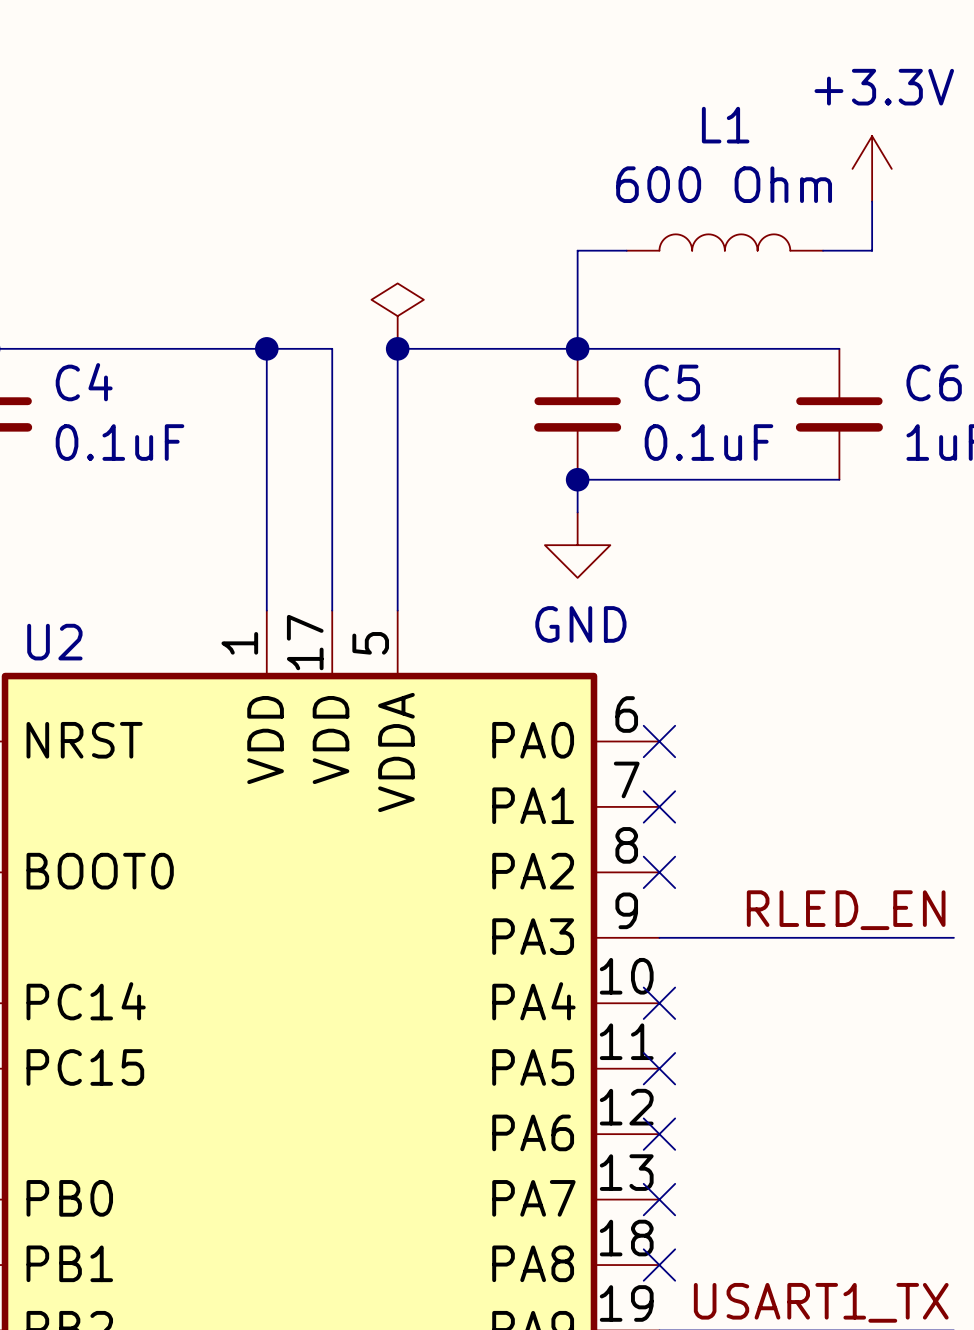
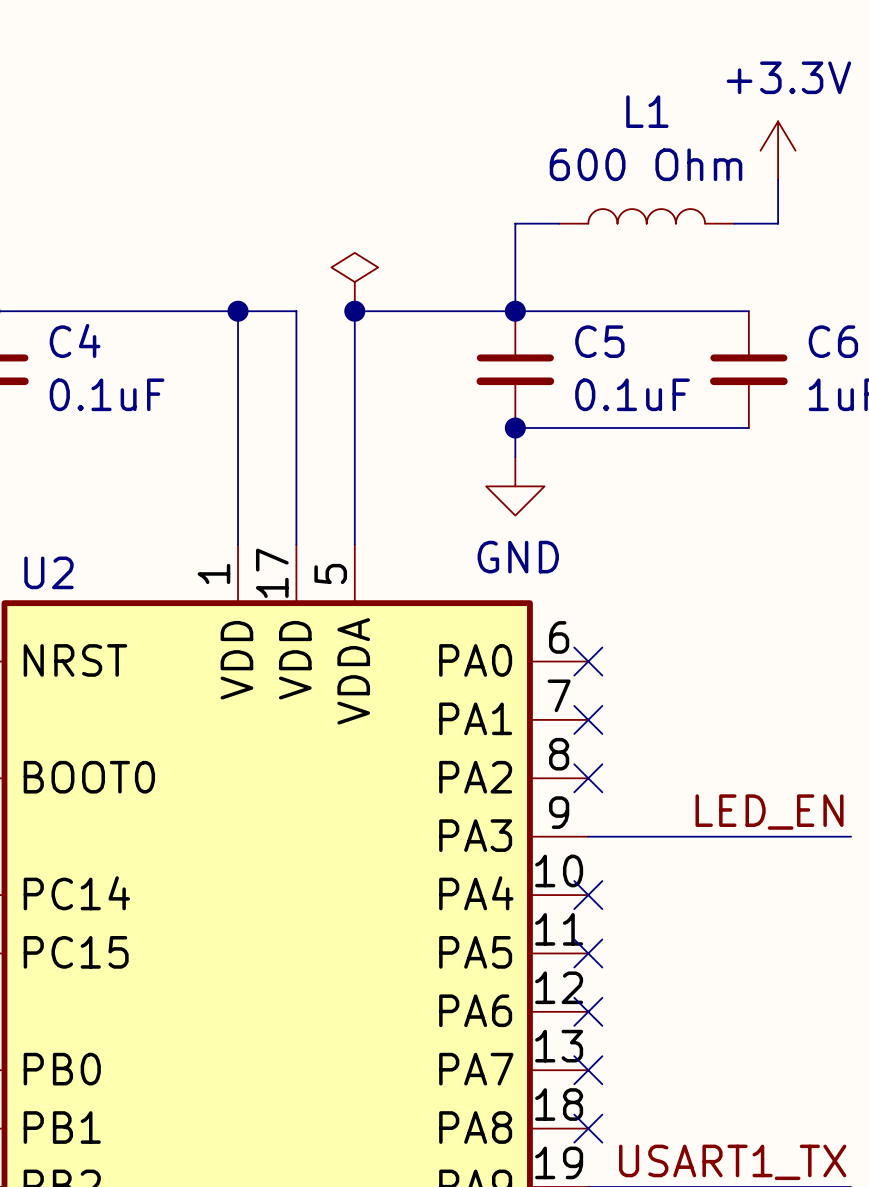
label: RLED_EN (846, 910) -> LED_EN (769, 812)

